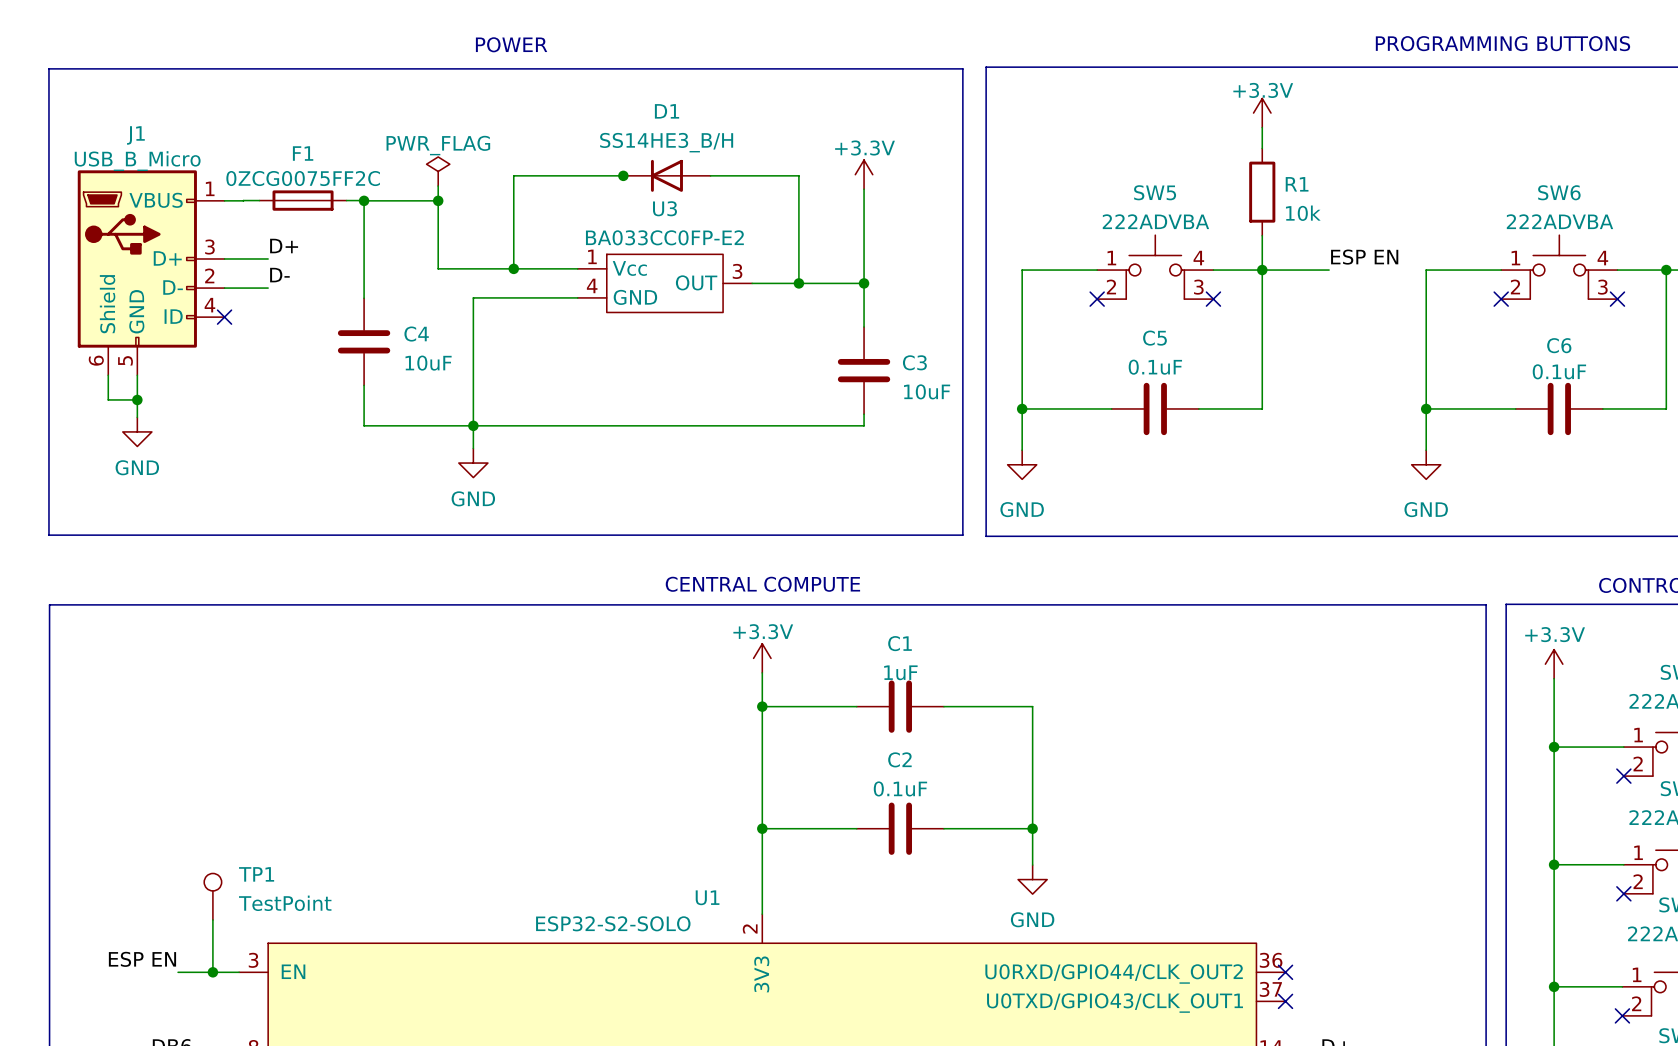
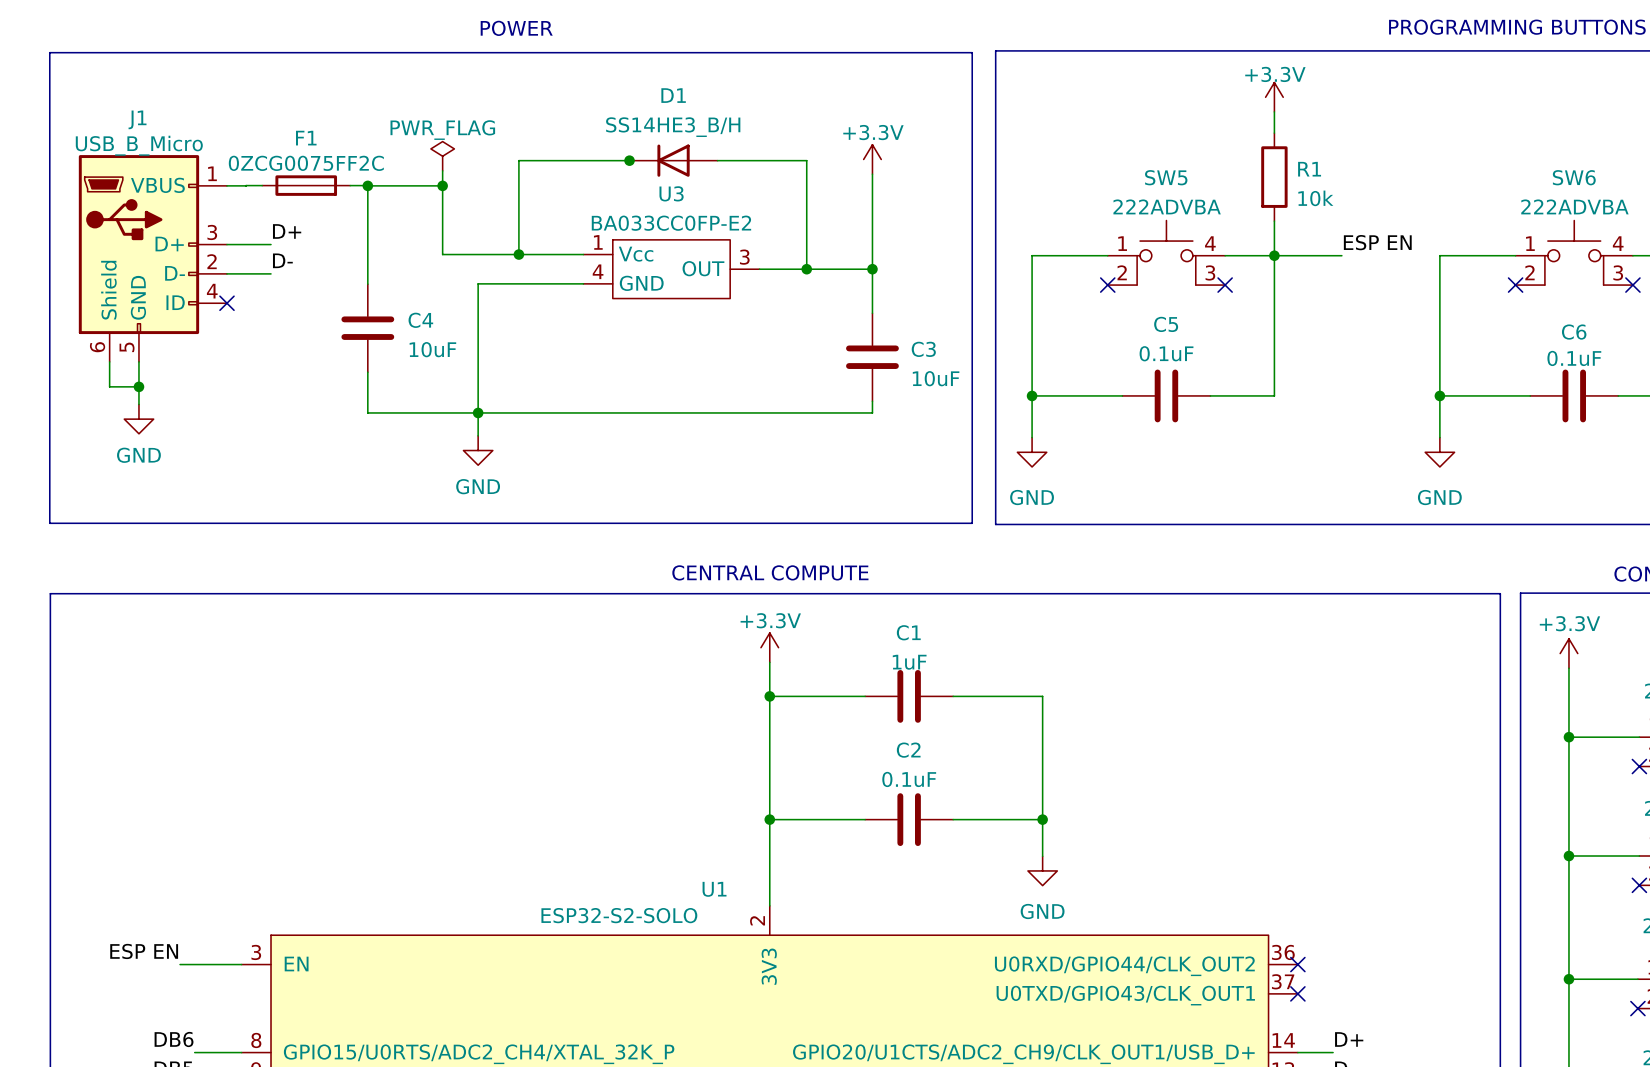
TP1: TestPoint (212, 896) -> none
wire: (212, 919) (212, 972) -> none
junction: (212, 972) -> none

